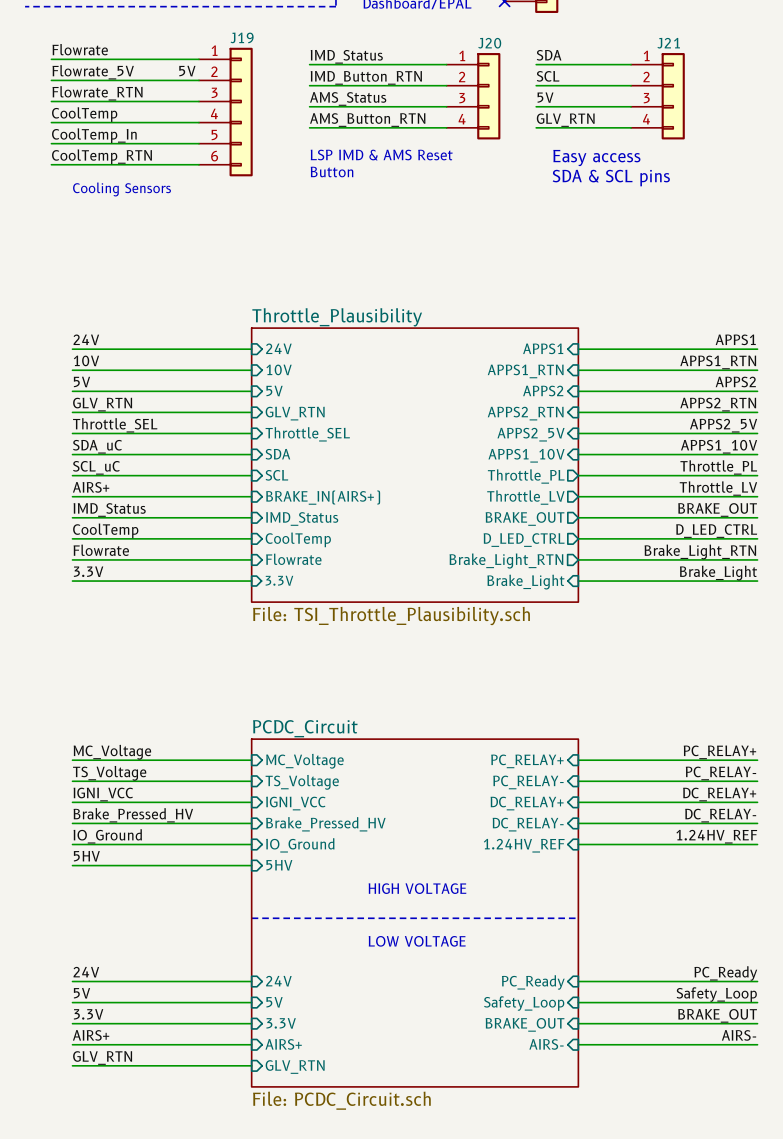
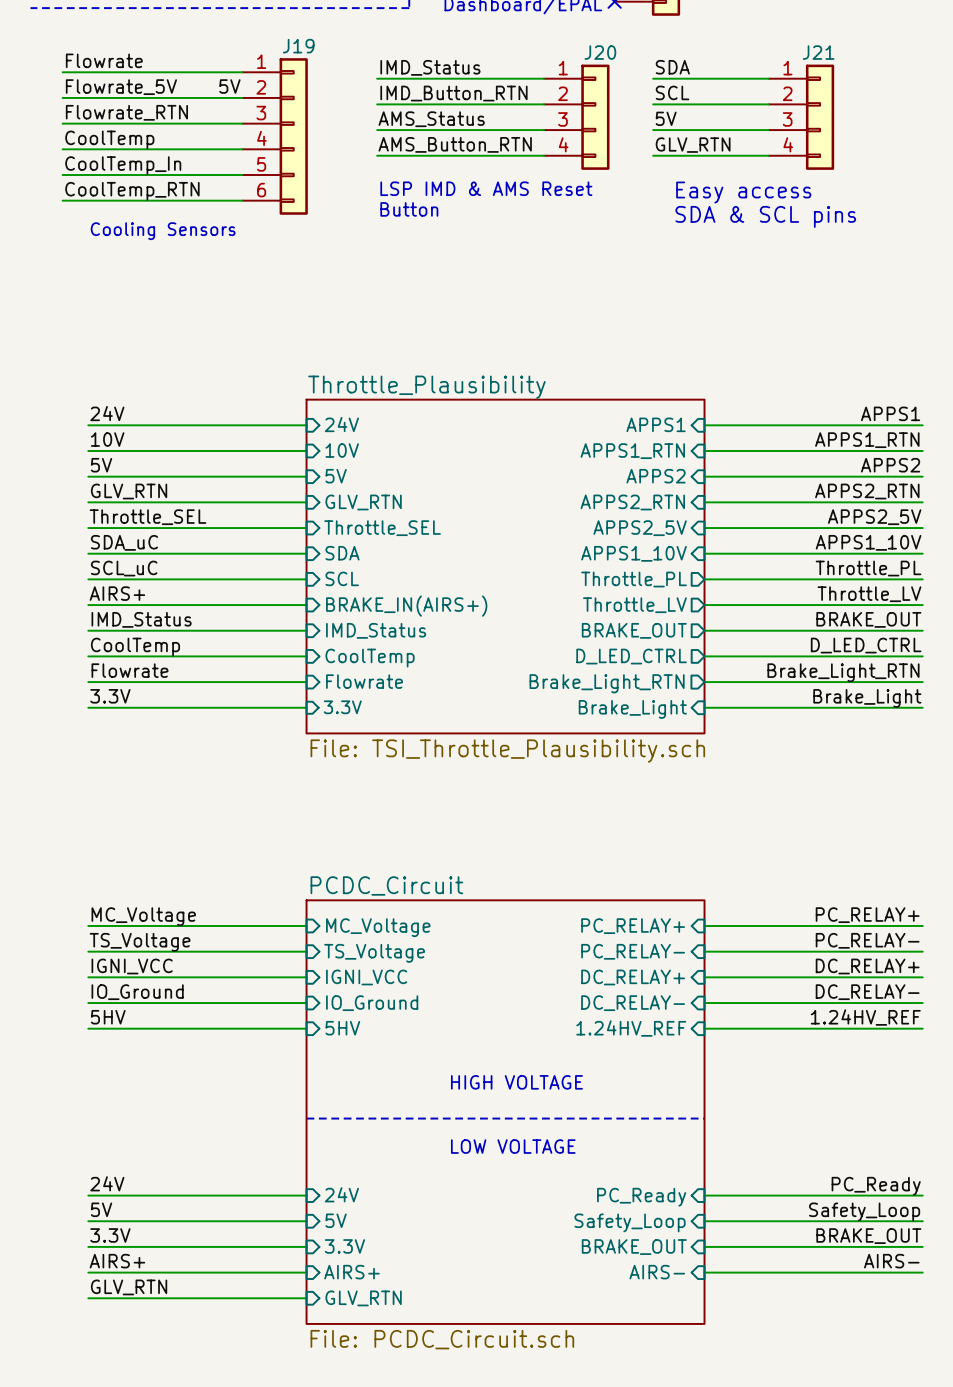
label: Brake_Pressed_HV (133, 815) -> IO_Ground (137, 992)
sheet pin: Brake_Pressed_HV (325, 824) -> IO_Ground (372, 1003)
label: IO_Ground (107, 836) -> 5HV (108, 1017)
sheet pin: IO_Ground (300, 845) -> 5HV (342, 1028)
label: 5HV (86, 856) -> none
wire: (72, 865) (251, 865) -> none
sheet pin: 5HV (279, 865) -> none

